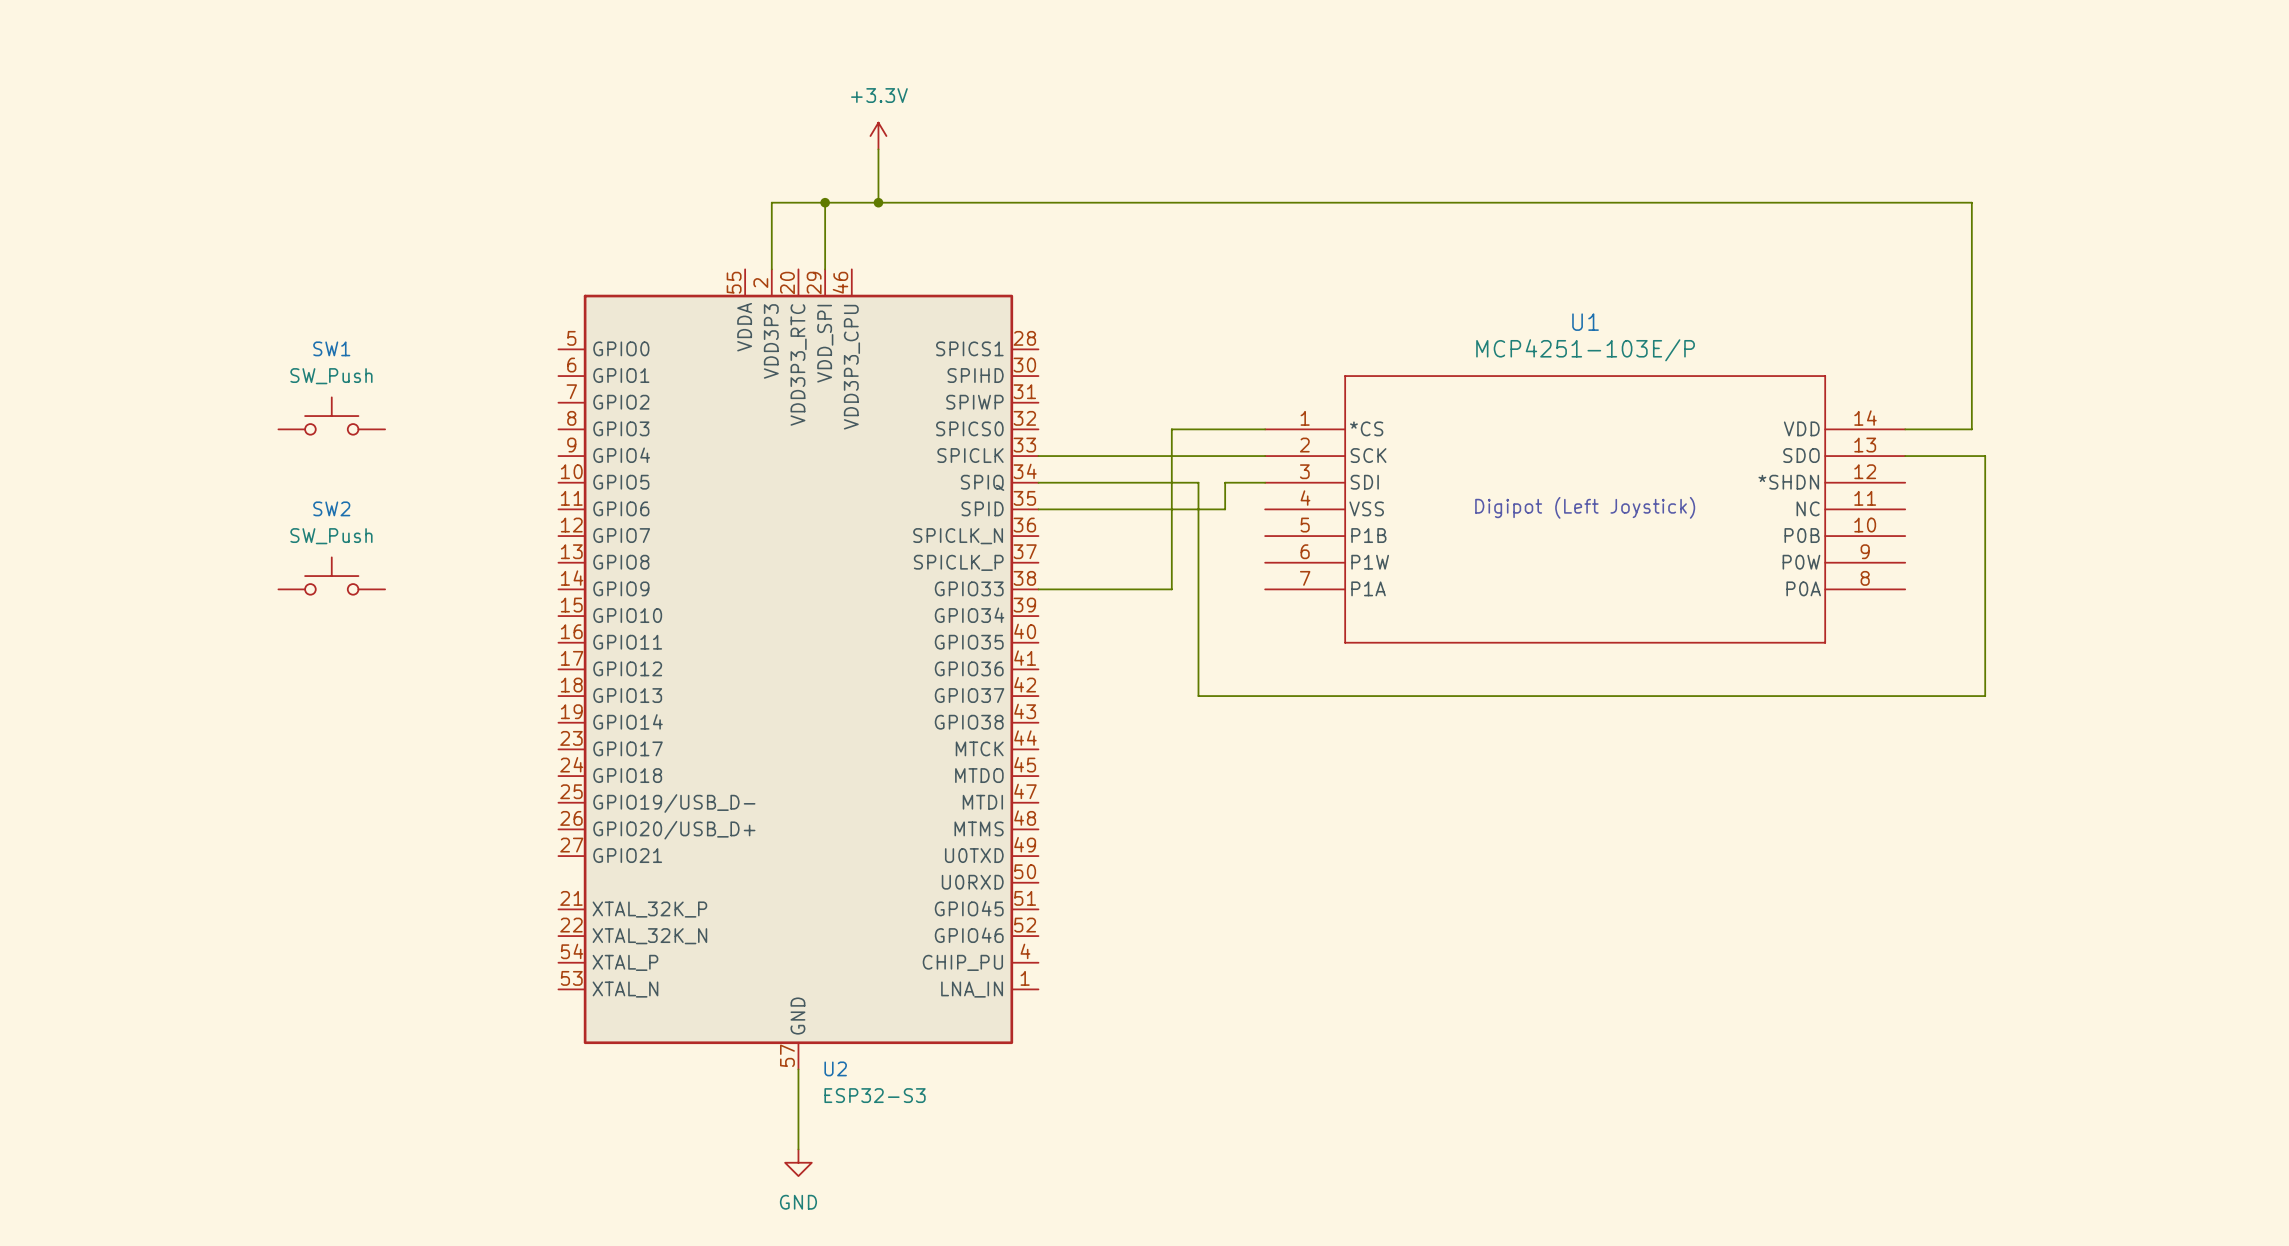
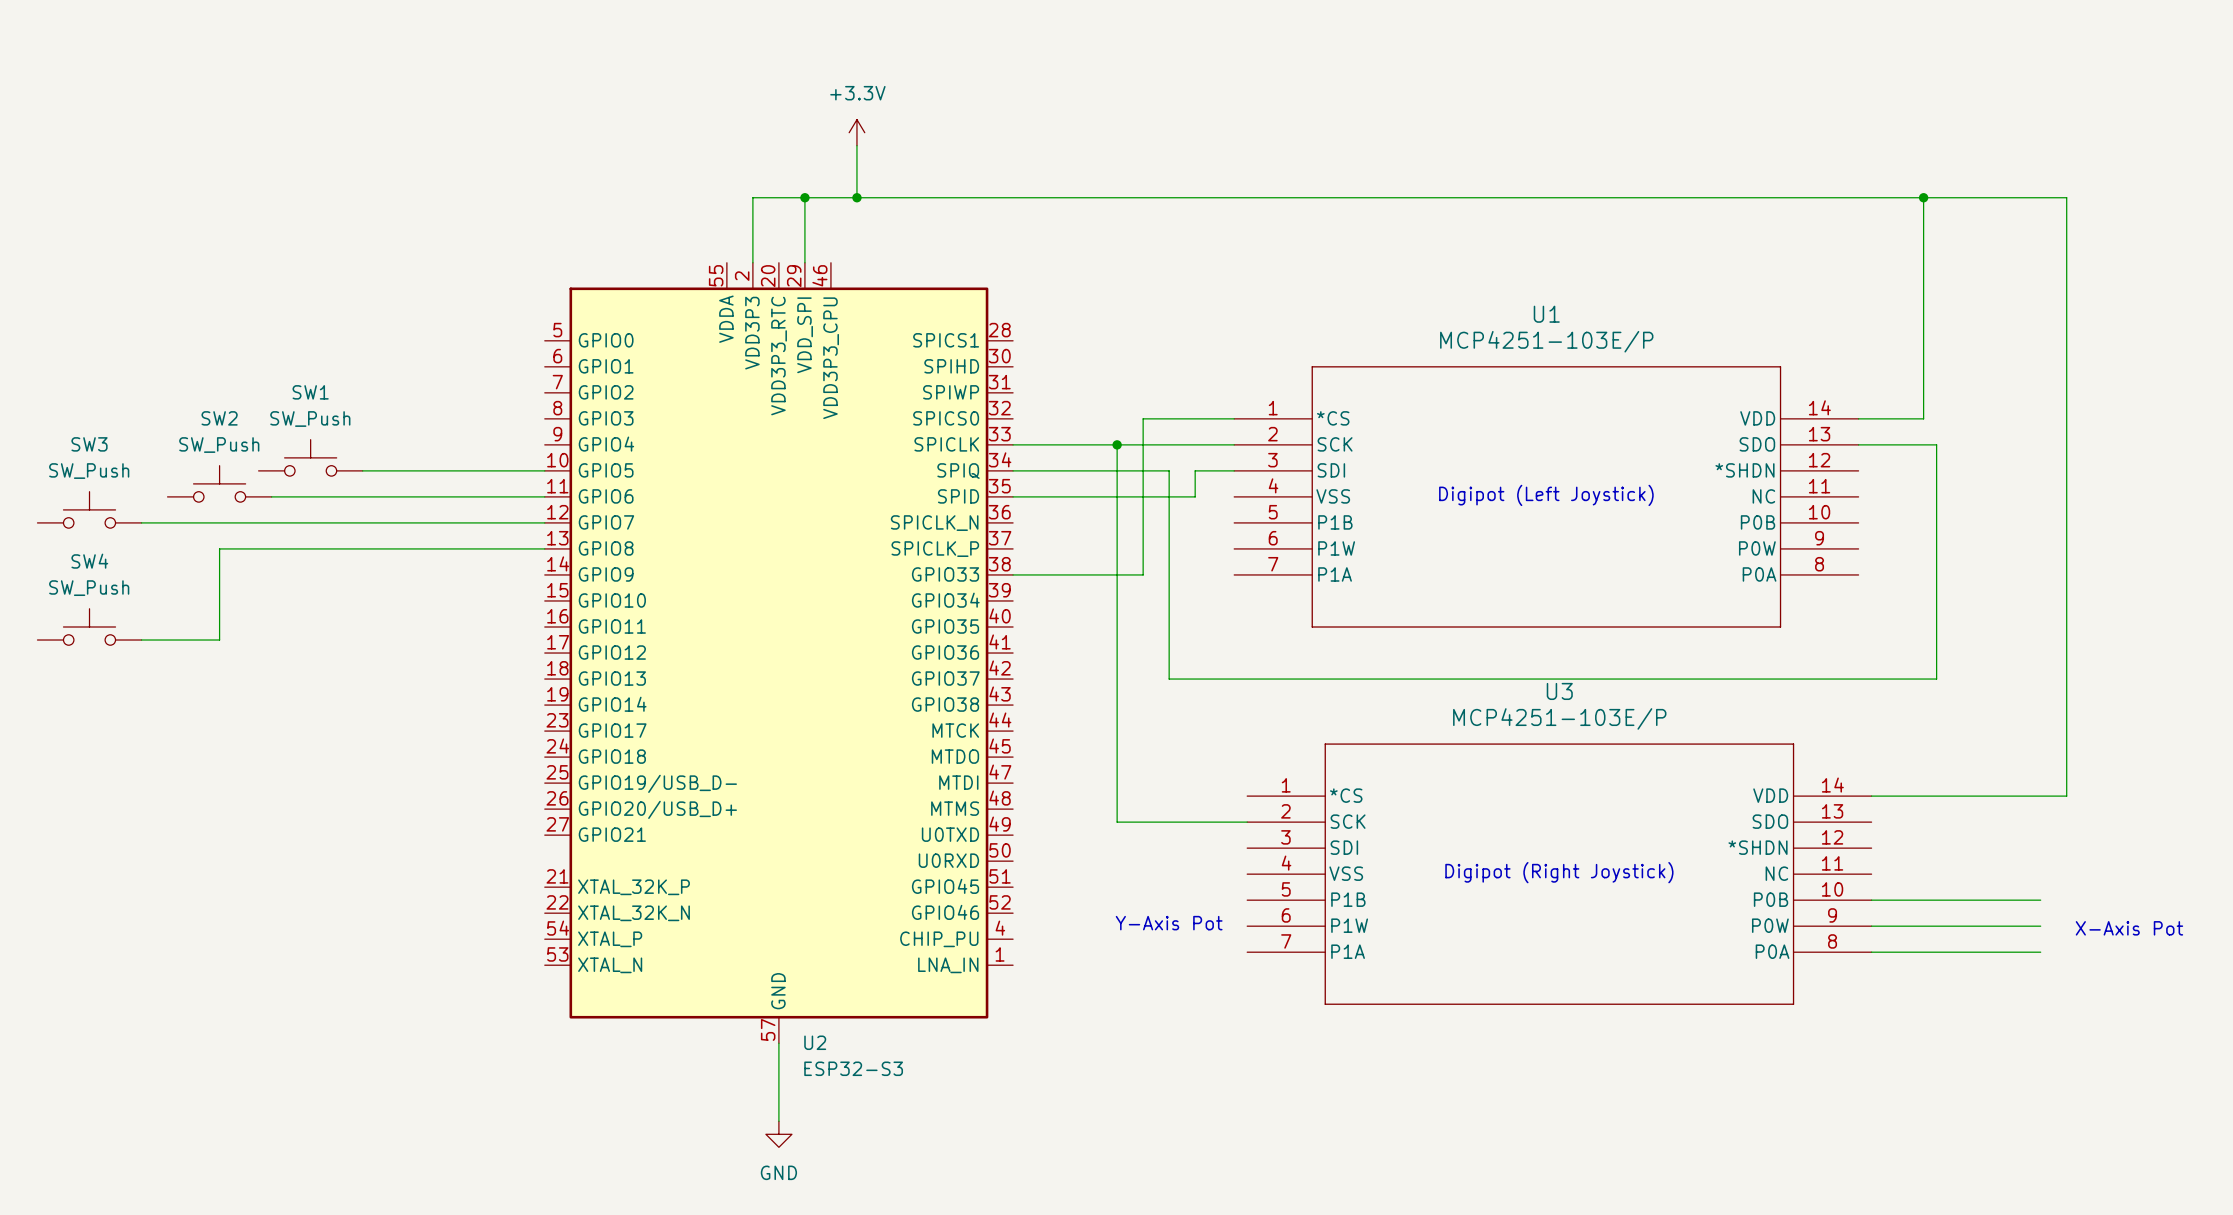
wire: none -> (1923, 197) (2066, 197) (2066, 796) (1871, 796)
junction: none -> (1923, 197)
SW1 position: (331, 416) -> (310, 457)
wire: none -> (1117, 444) (1117, 822) (1247, 822)
junction: none -> (1117, 444)
wire: none -> (362, 470) (544, 470)
wire: none -> (271, 496) (544, 496)
SW3: none -> SW_Push (89, 509)
wire: none -> (141, 522) (544, 522)
wire: none -> (544, 548) (219, 548) (219, 640) (141, 640)
SW2 position: (331, 576) -> (219, 483)
SW4: none -> SW_Push (89, 627)
text: none -> Digipot (Right Joystick) (1559, 872)
U3: none -> MCP4251-103E/P (1559, 874)
wire: none -> (1871, 900) (2040, 900)
text: none -> Y-Axis Pot (1169, 923)
wire: none -> (1871, 926) (2040, 926)
text: none -> X-Axis Pot (2129, 928)
wire: none -> (1871, 952) (2040, 952)

